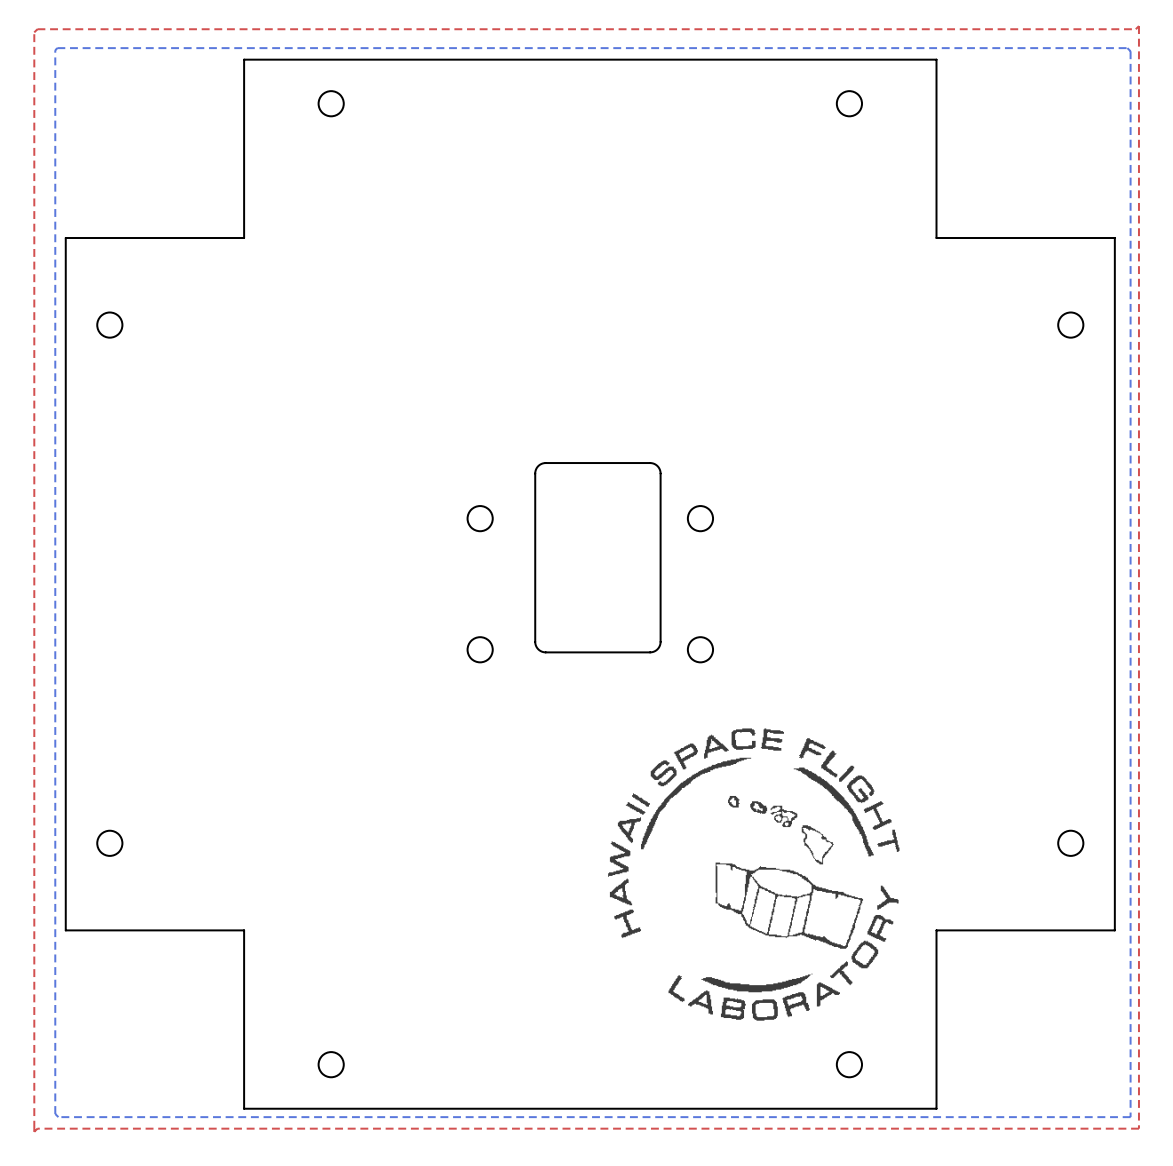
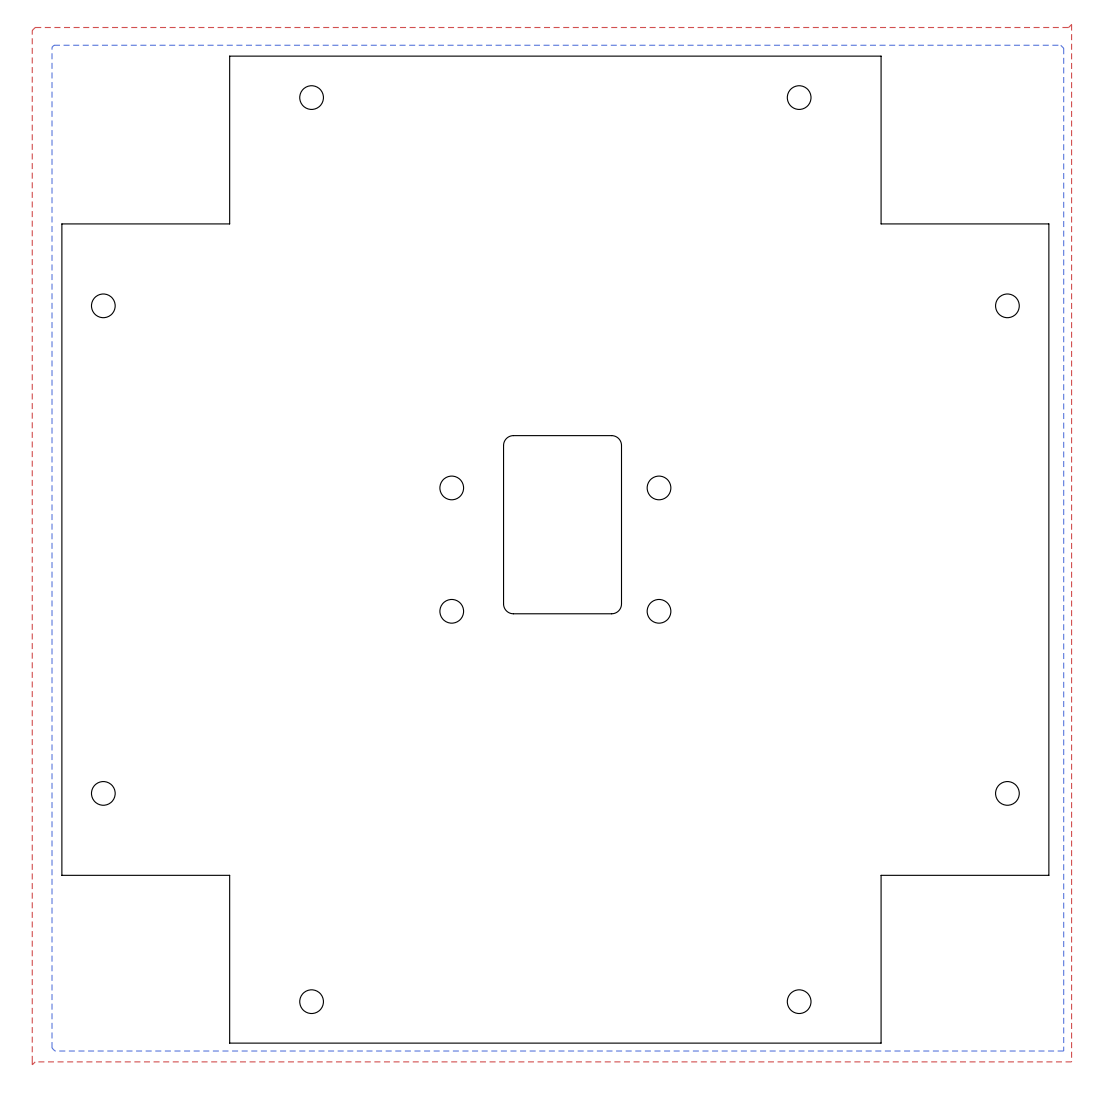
drawing: [608, 728, 784, 939] -> none
drawing: [793, 738, 900, 857] -> none
drawing: [728, 795, 834, 865] -> none
drawing: [668, 862, 899, 1021] -> none

